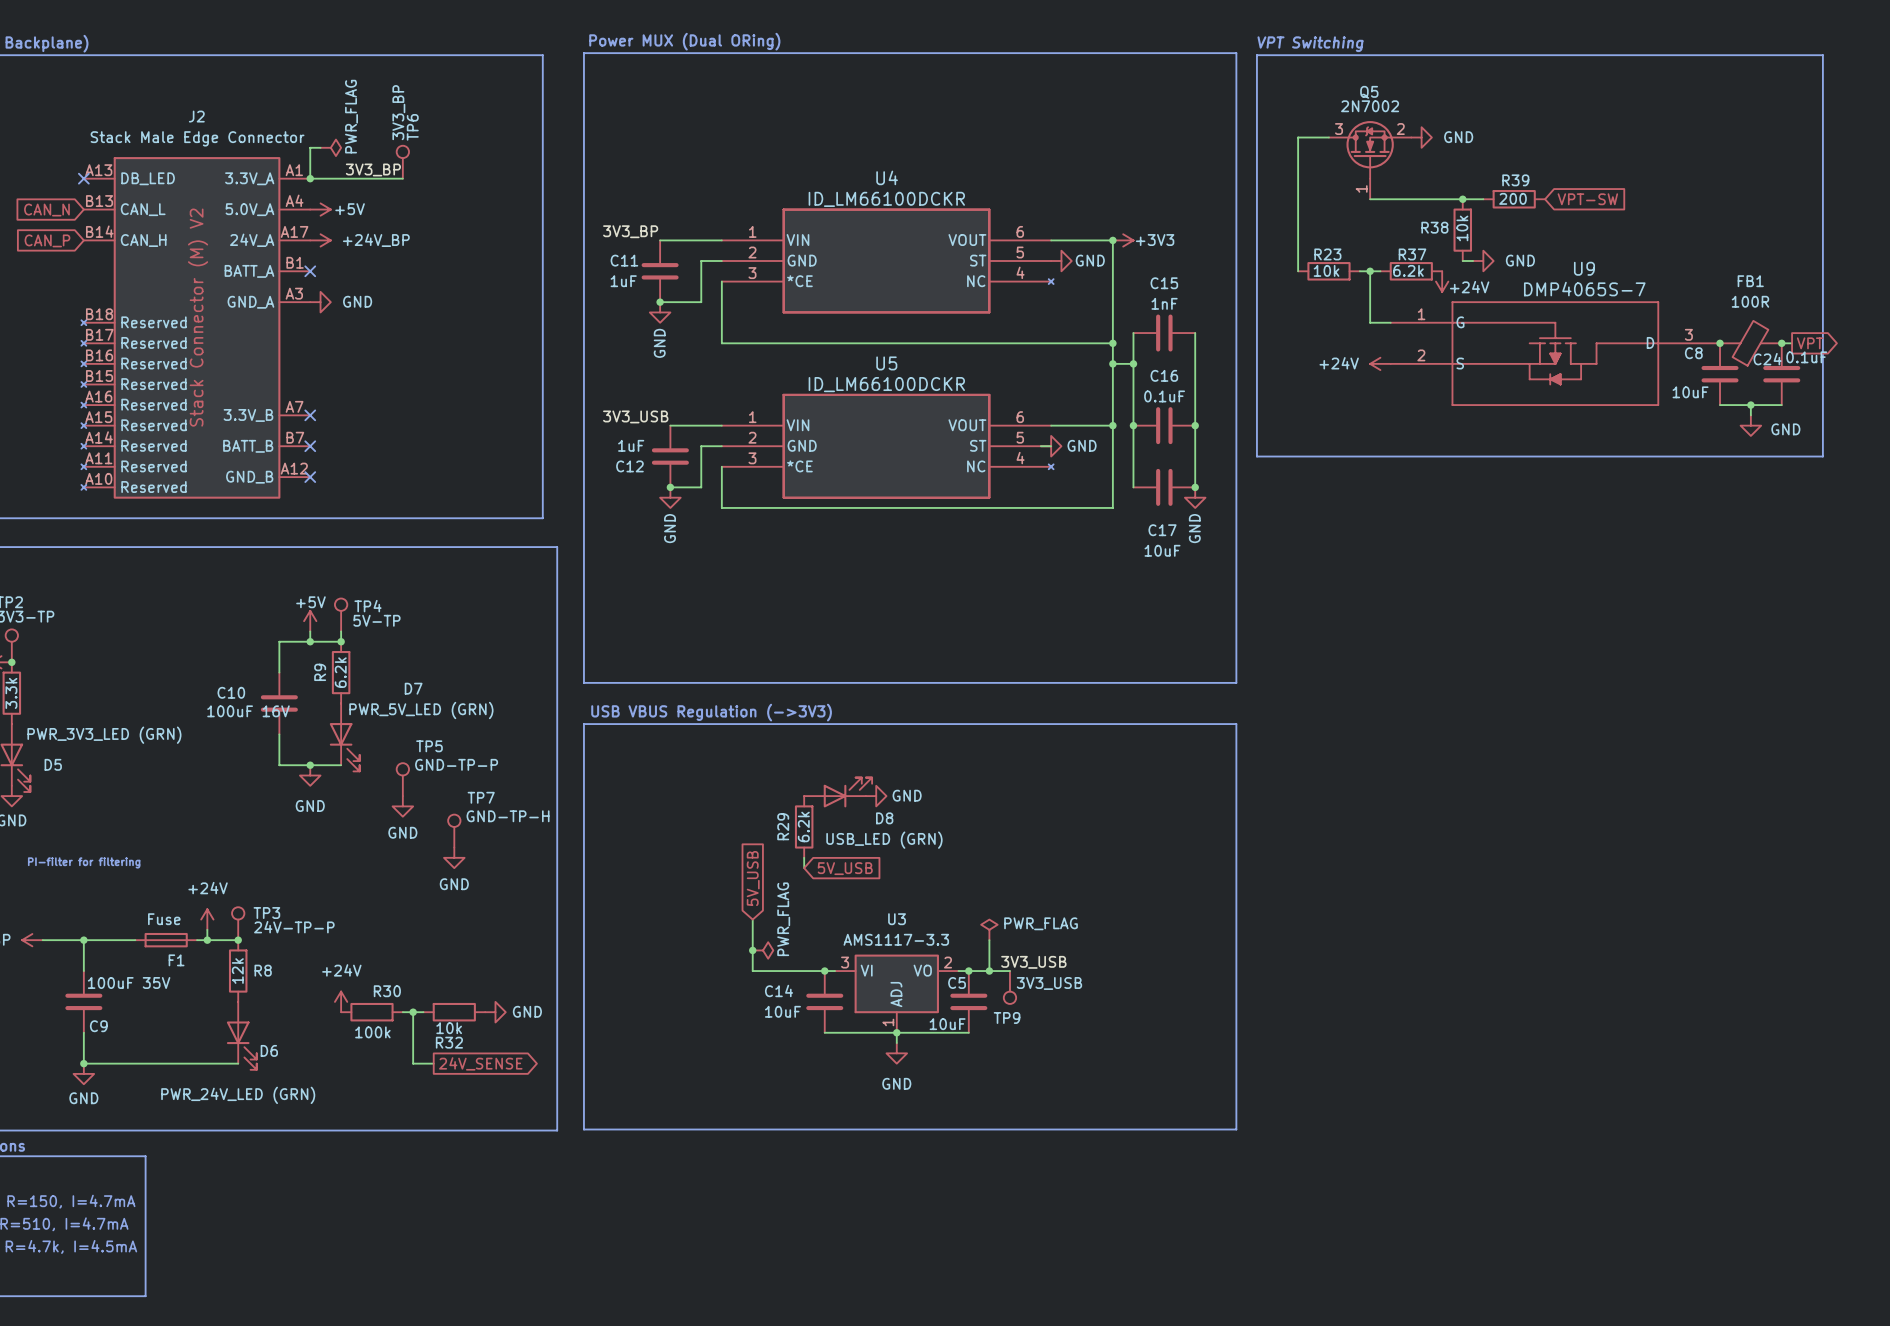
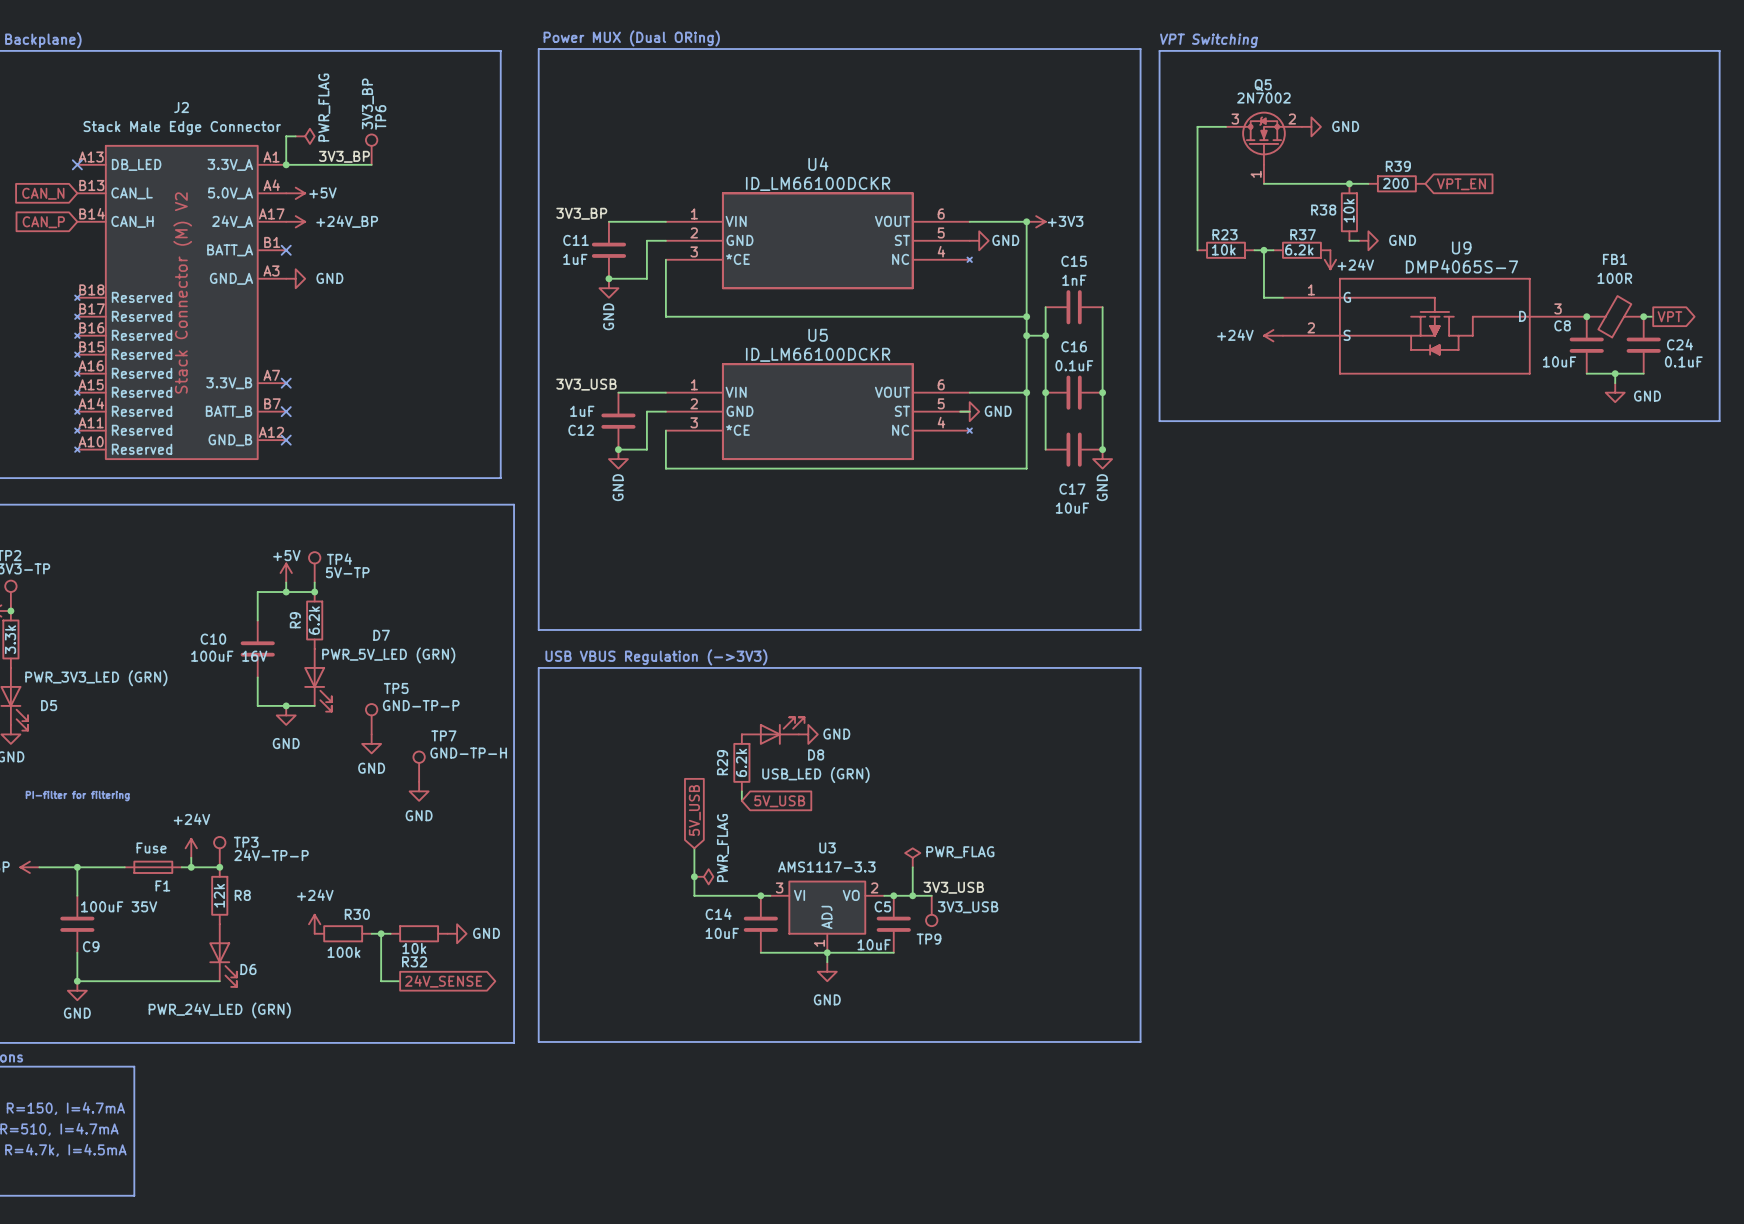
line: (1822, 55) (1822, 456) -> (1681, 50) (1719, 50) (1719, 421) (1681, 421)
global label: VPT-SW (1587, 199) -> VPT_EN (1461, 184)
C24 value position: 0.1uF (1806, 357) -> 0.1uF (1683, 361)
C24 name position: C24 (1767, 359) -> C24 (1679, 344)

